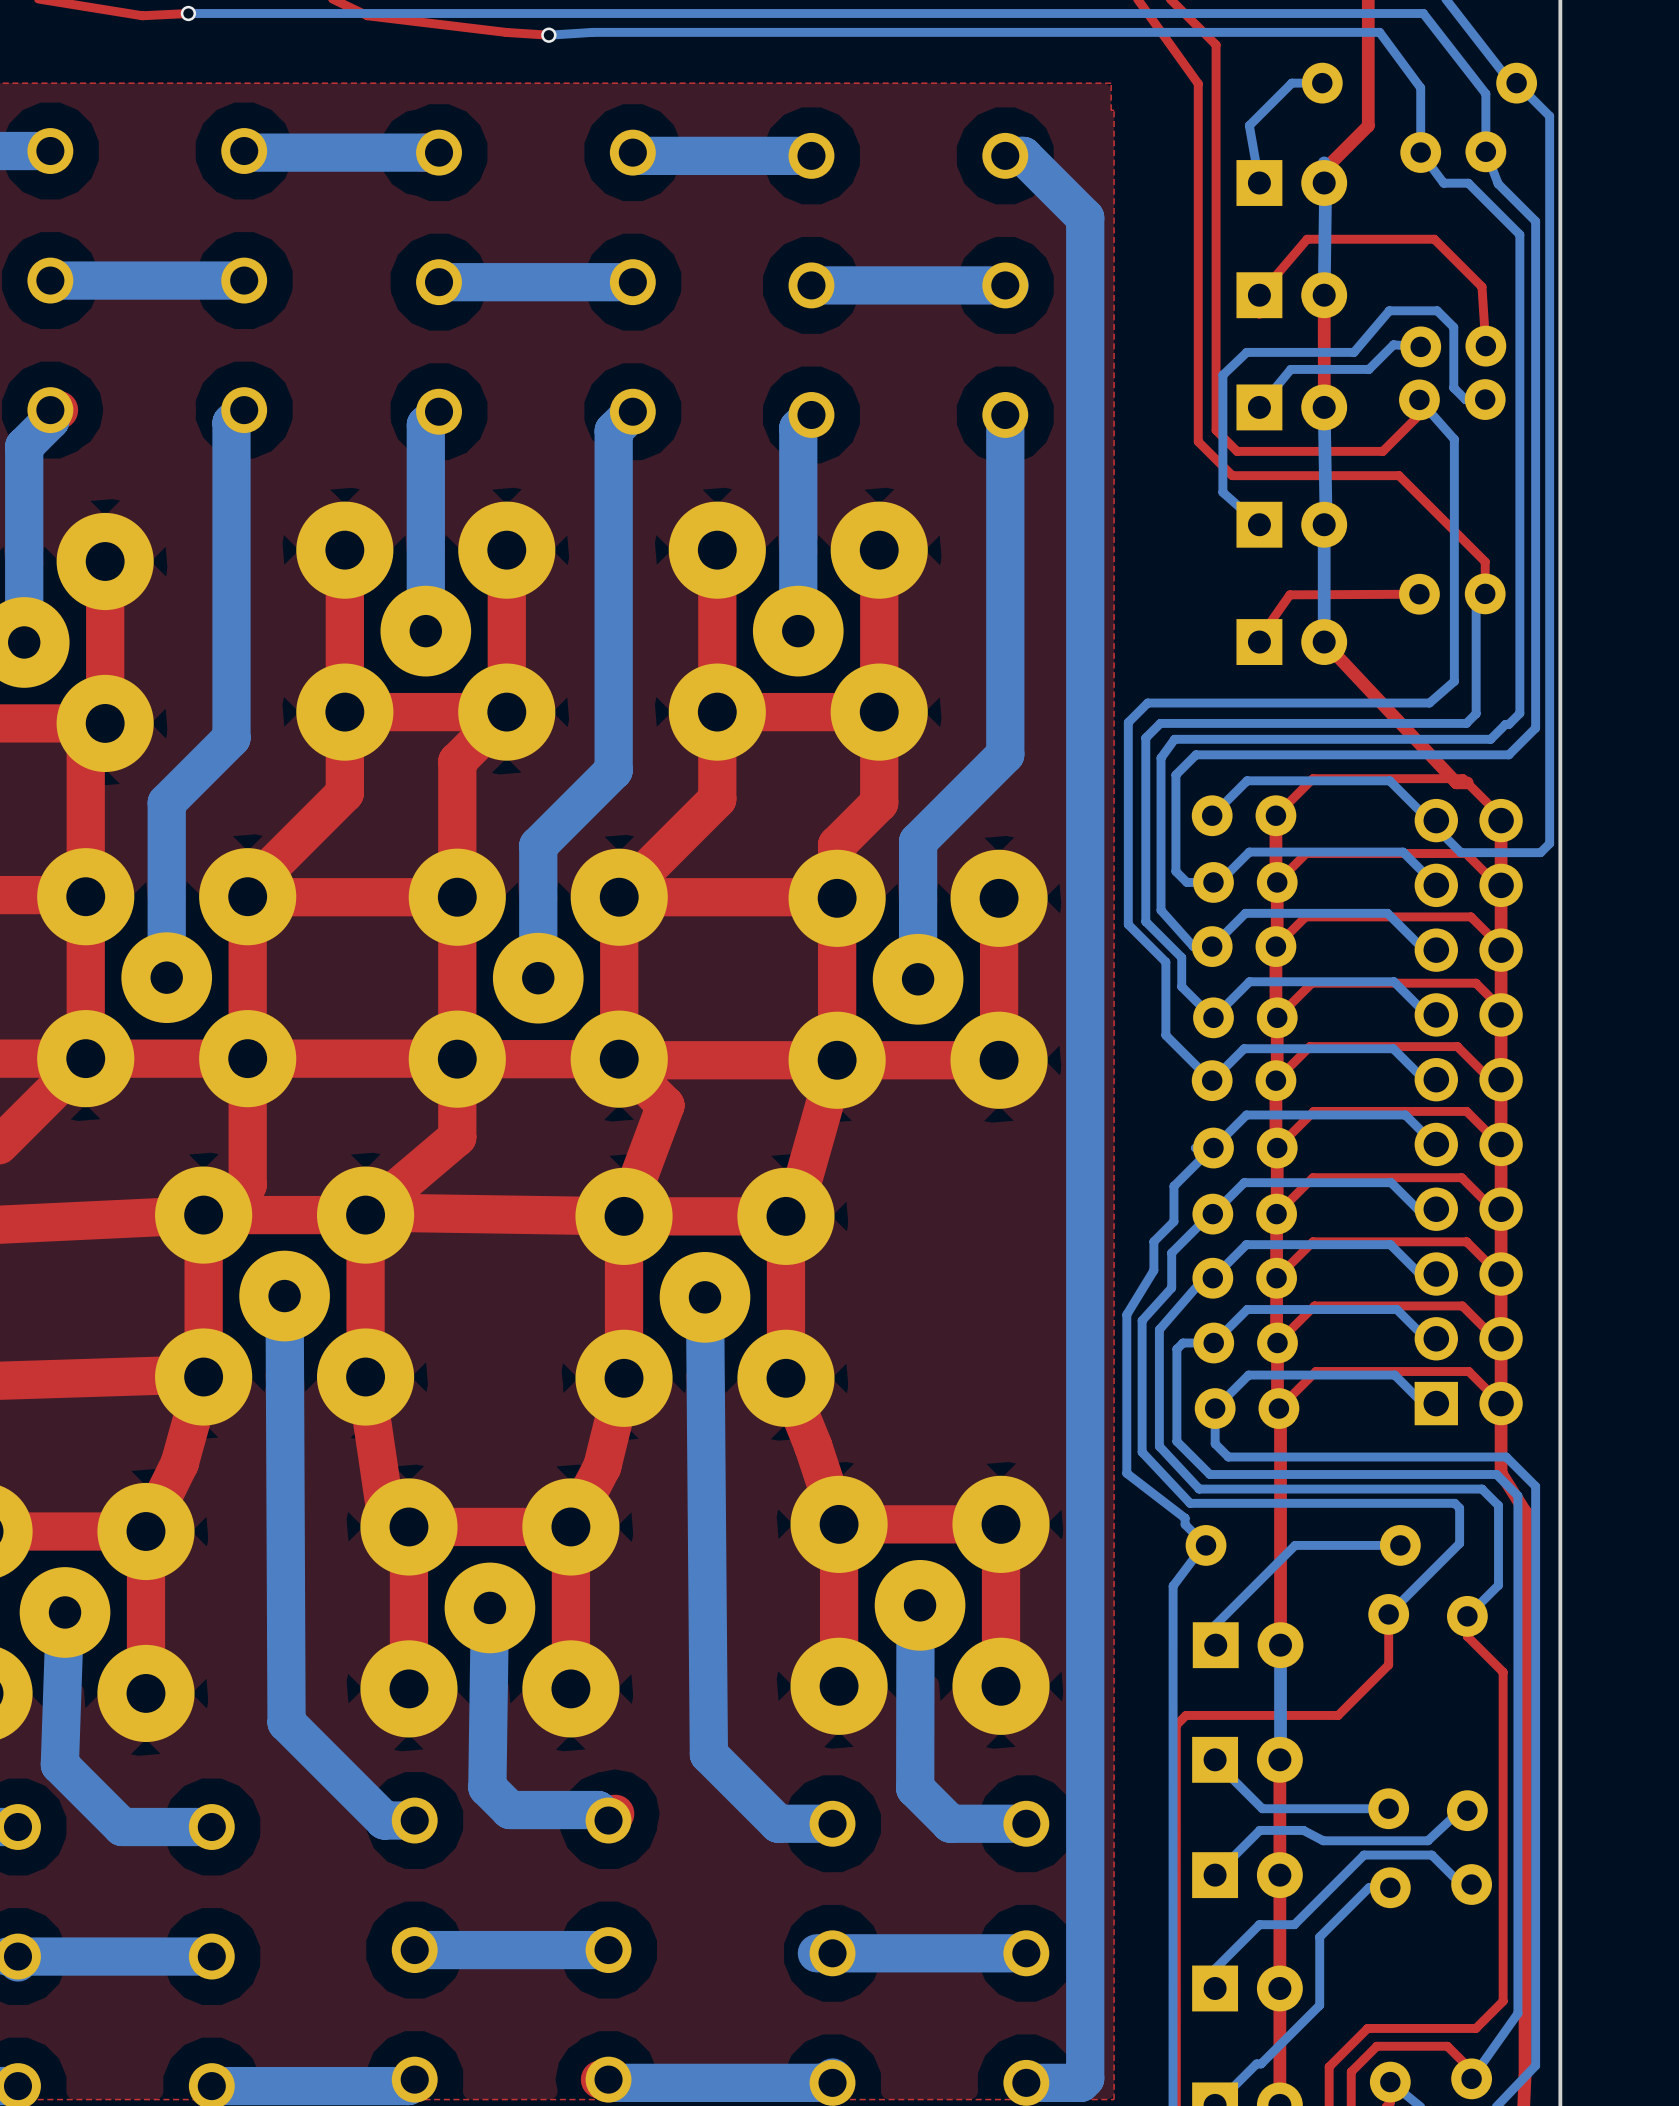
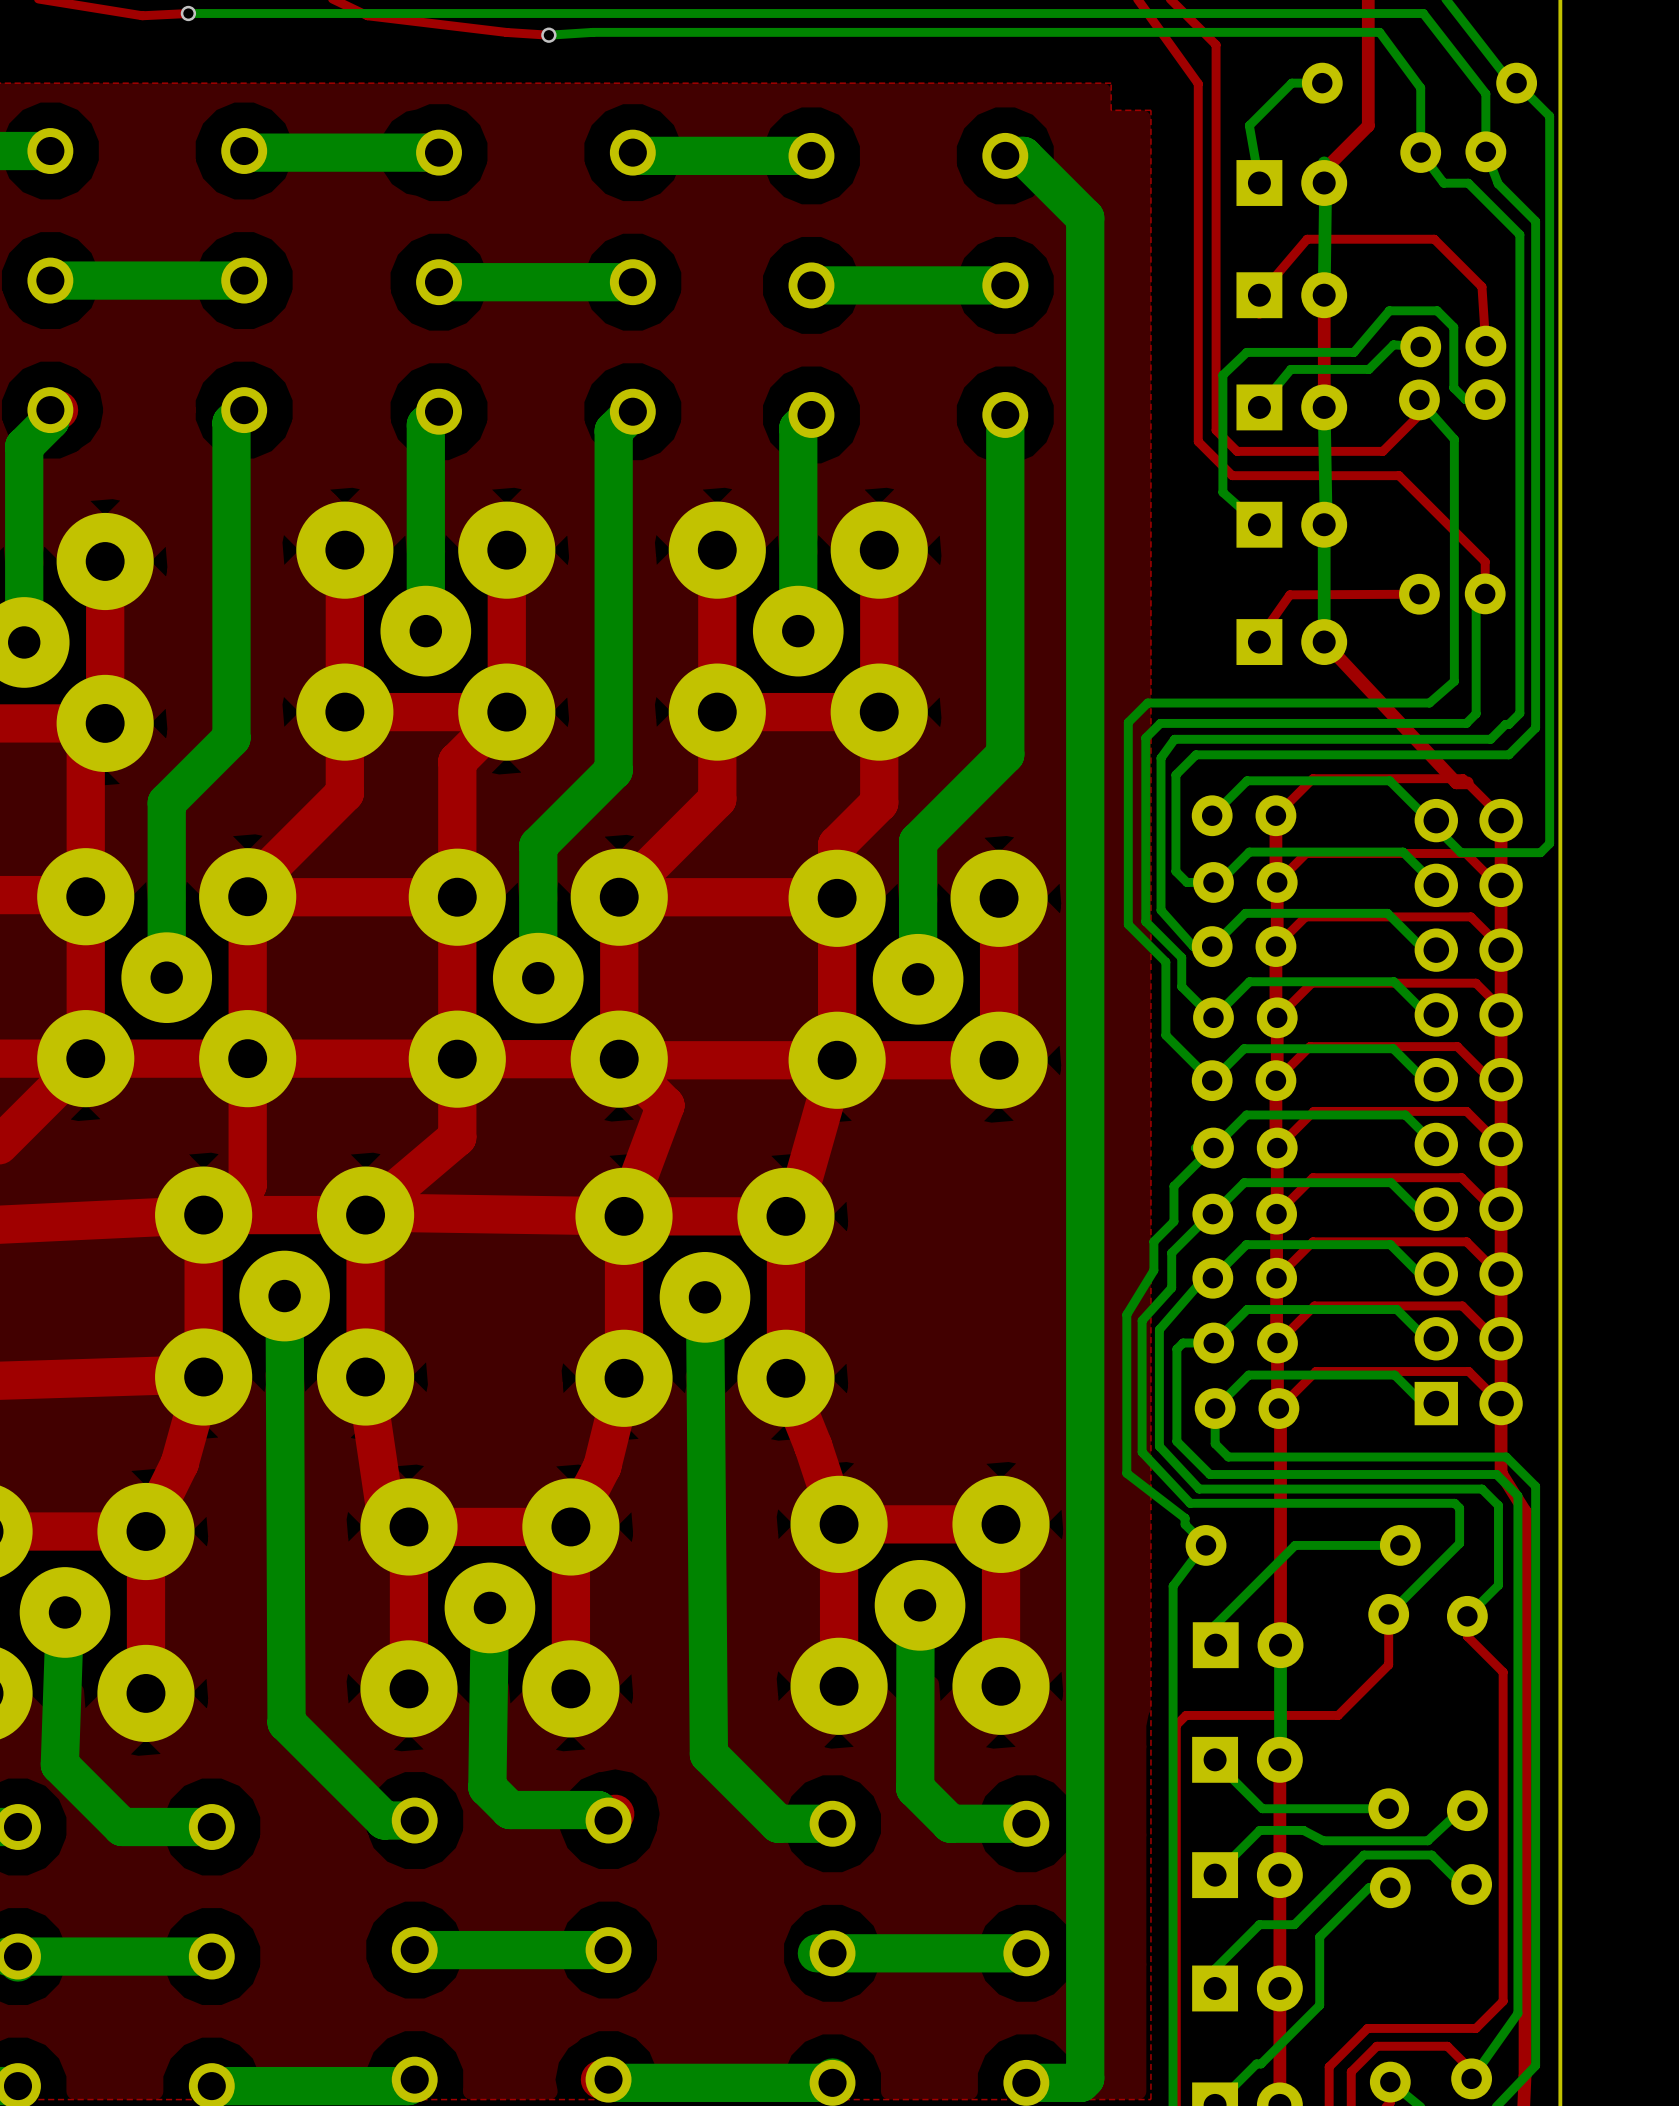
top zone outline: (1114, 110) (1114, 2099) -> (1114, 110) (1150, 110) (1150, 2099) (1114, 2099)

